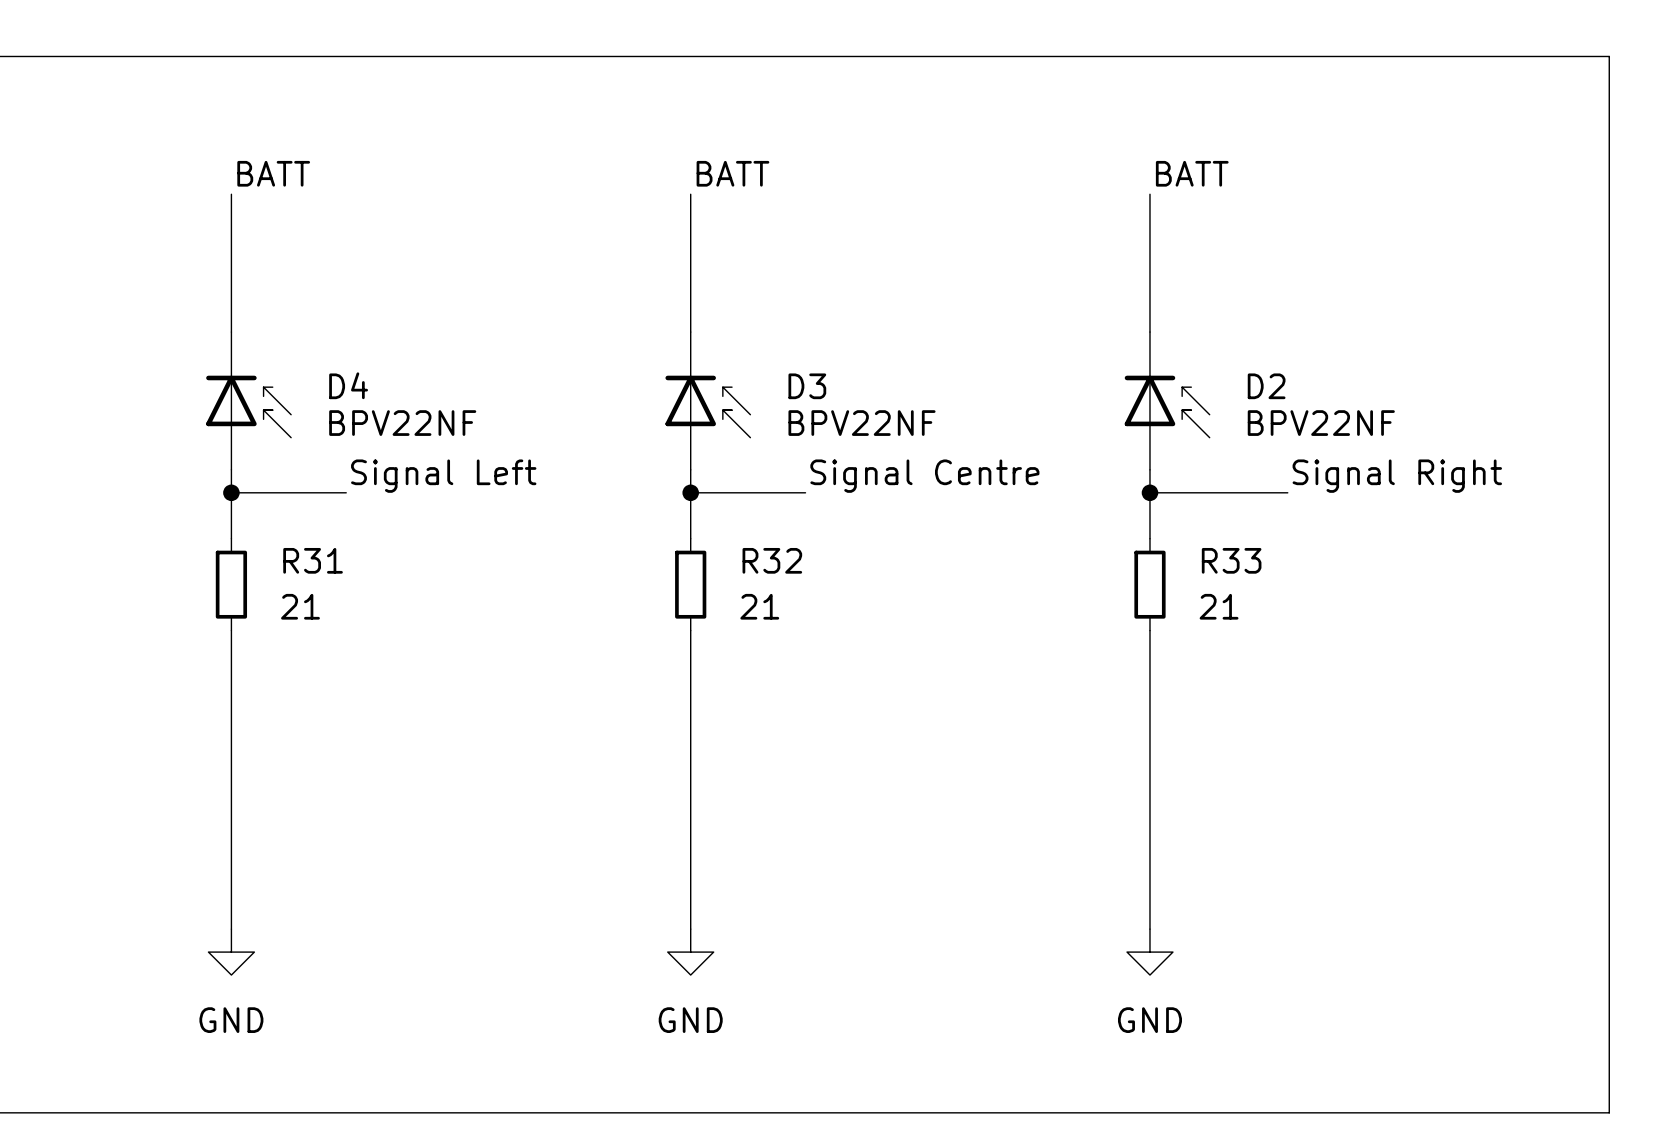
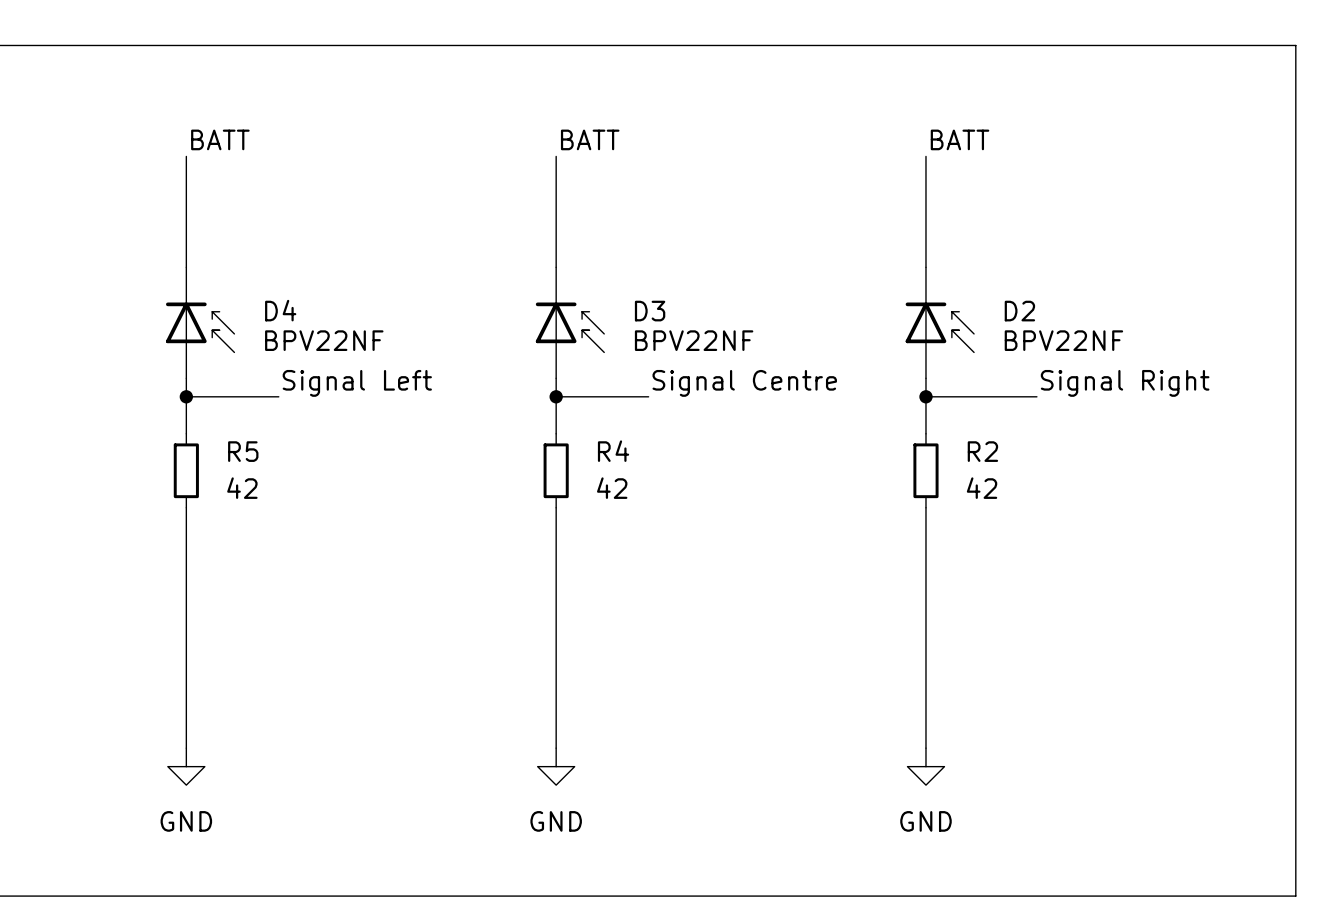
R31 name: R31 (313, 560) -> R5 (243, 451)
R32 name: R32 (772, 560) -> R4 (613, 451)
R33 name: R33 (1231, 560) -> R2 (982, 451)
R31 value: 21 (300, 606) -> 42 (242, 488)
R32 value: 21 (759, 606) -> 42 (612, 488)
R33 value: 21 (1219, 606) -> 42 (982, 488)

